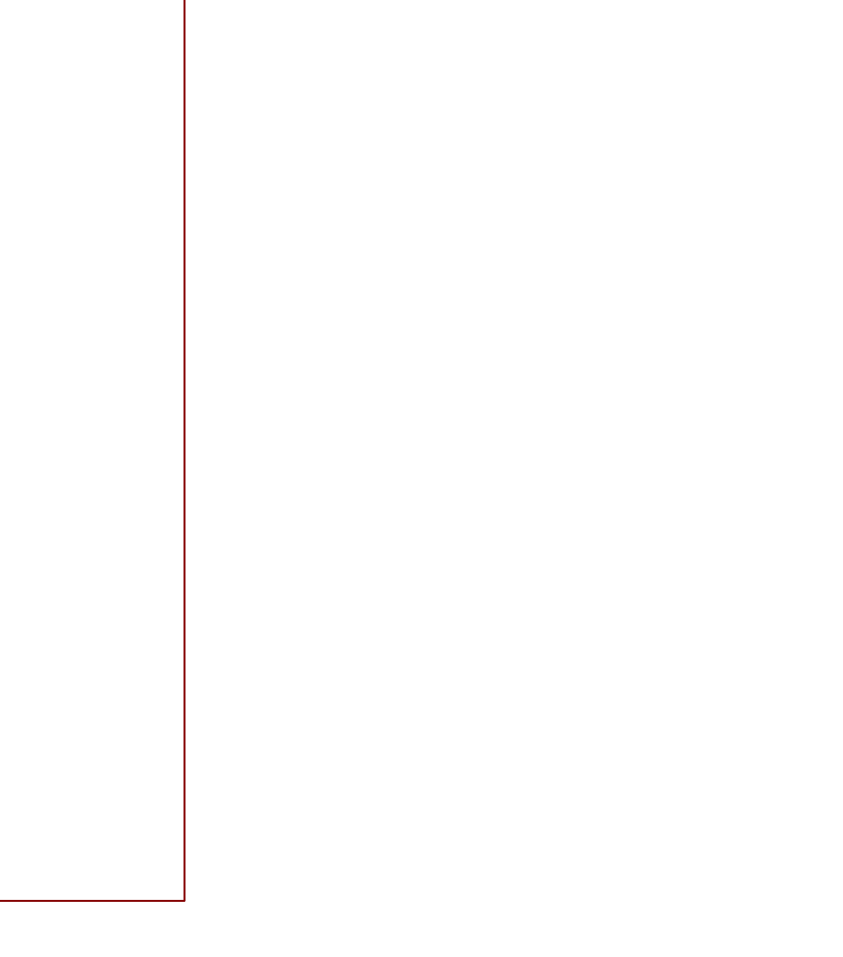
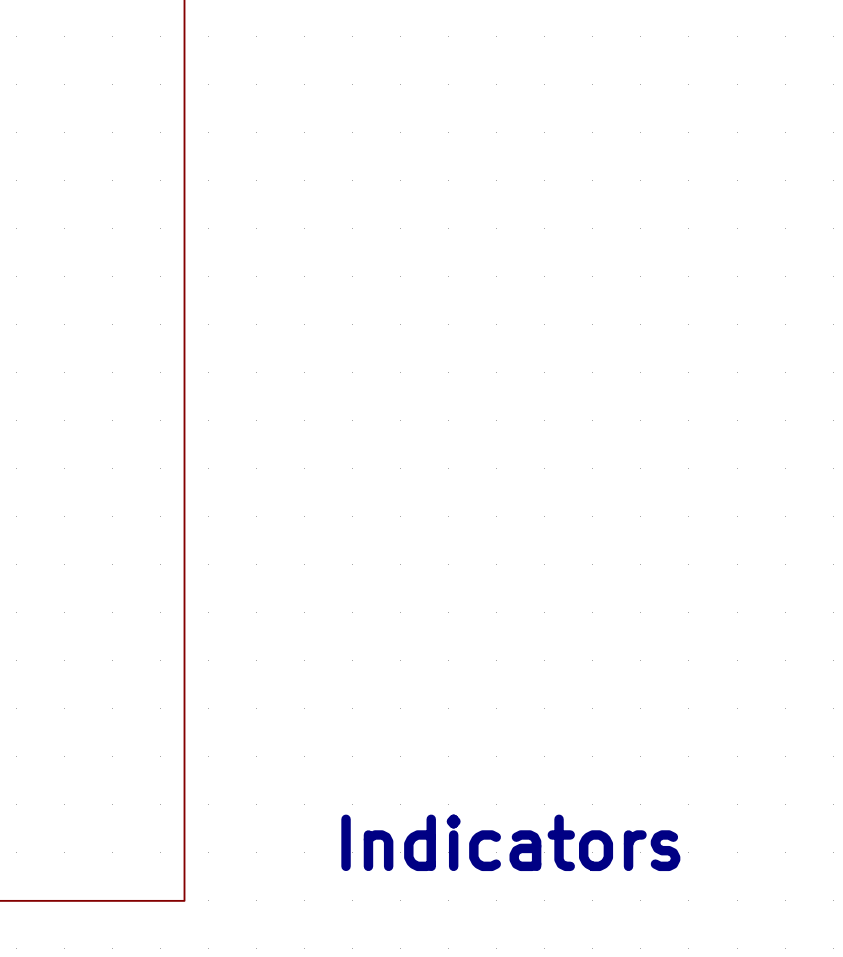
text: none -> Indicators (510, 842)

